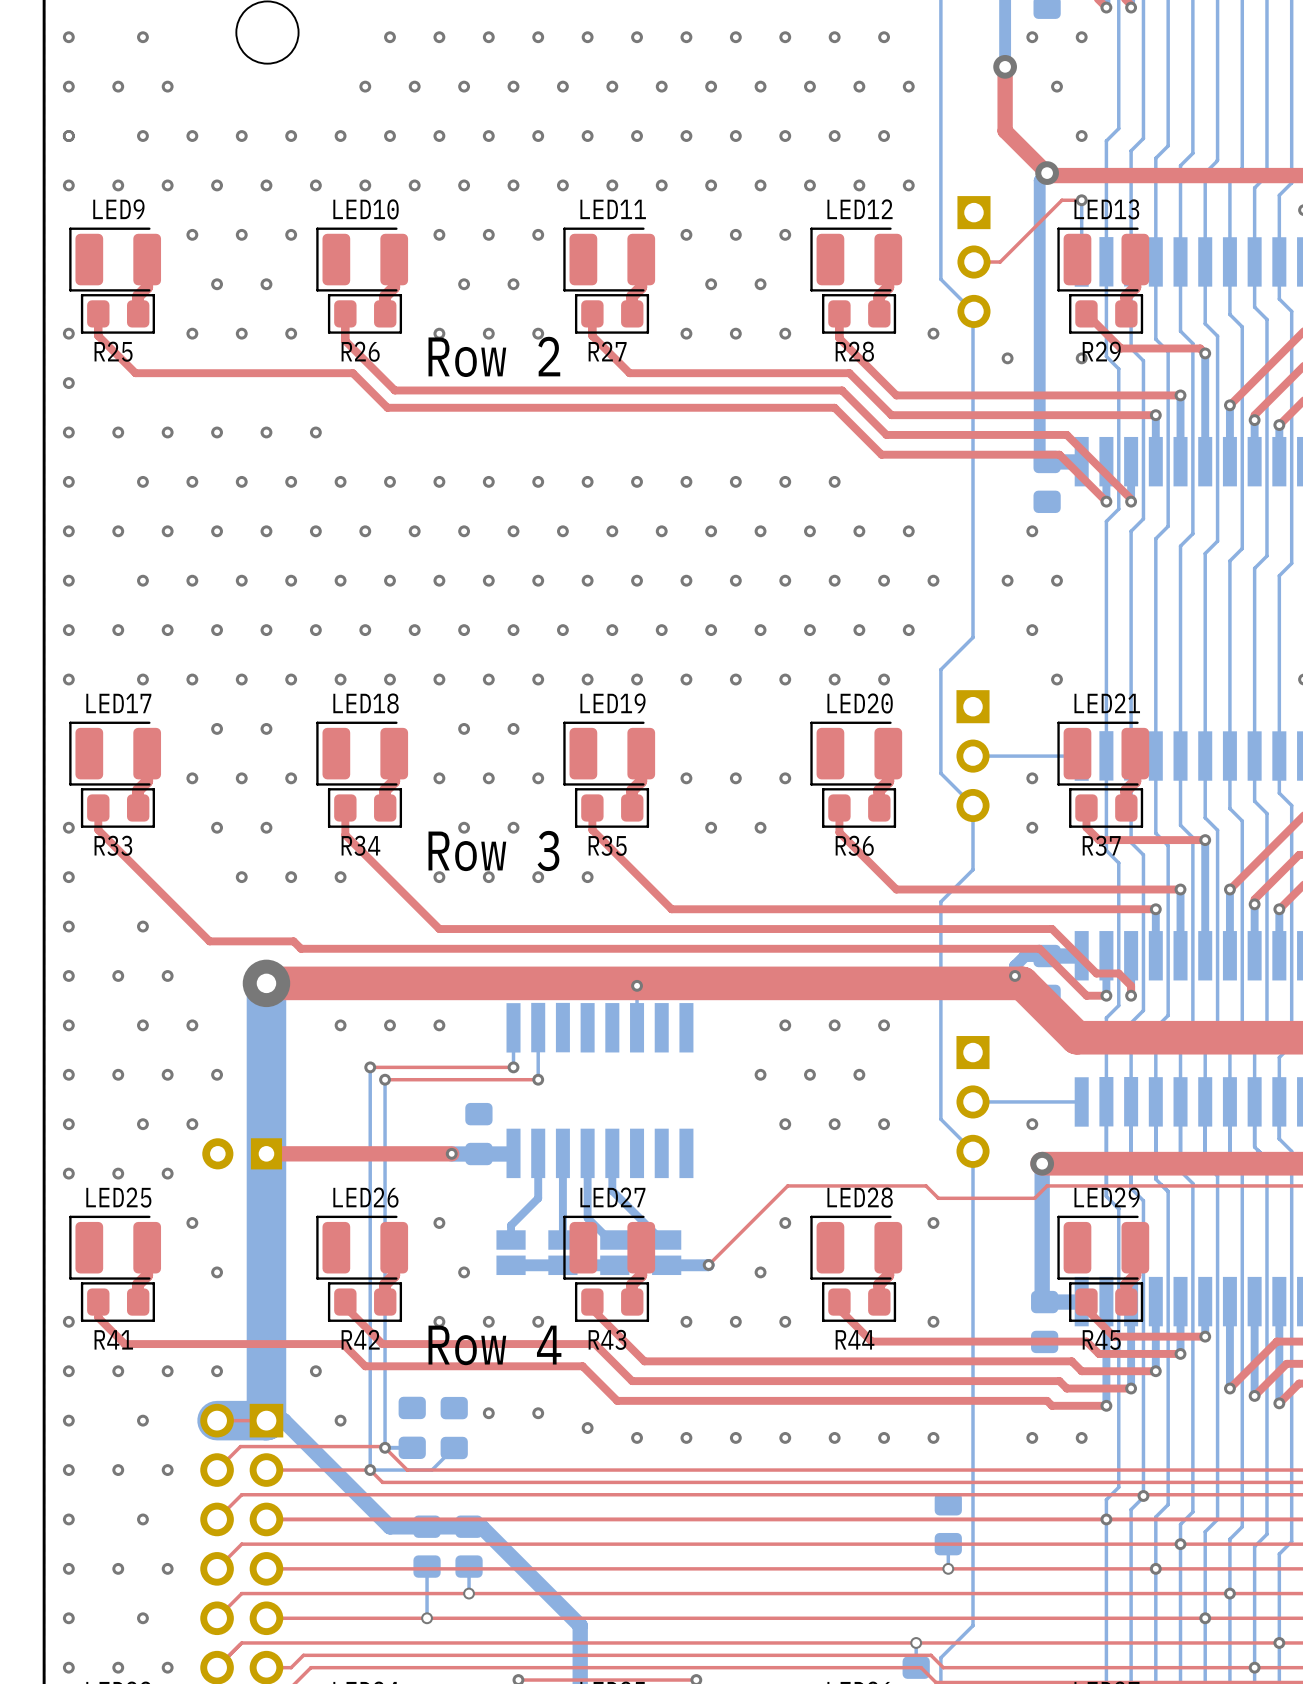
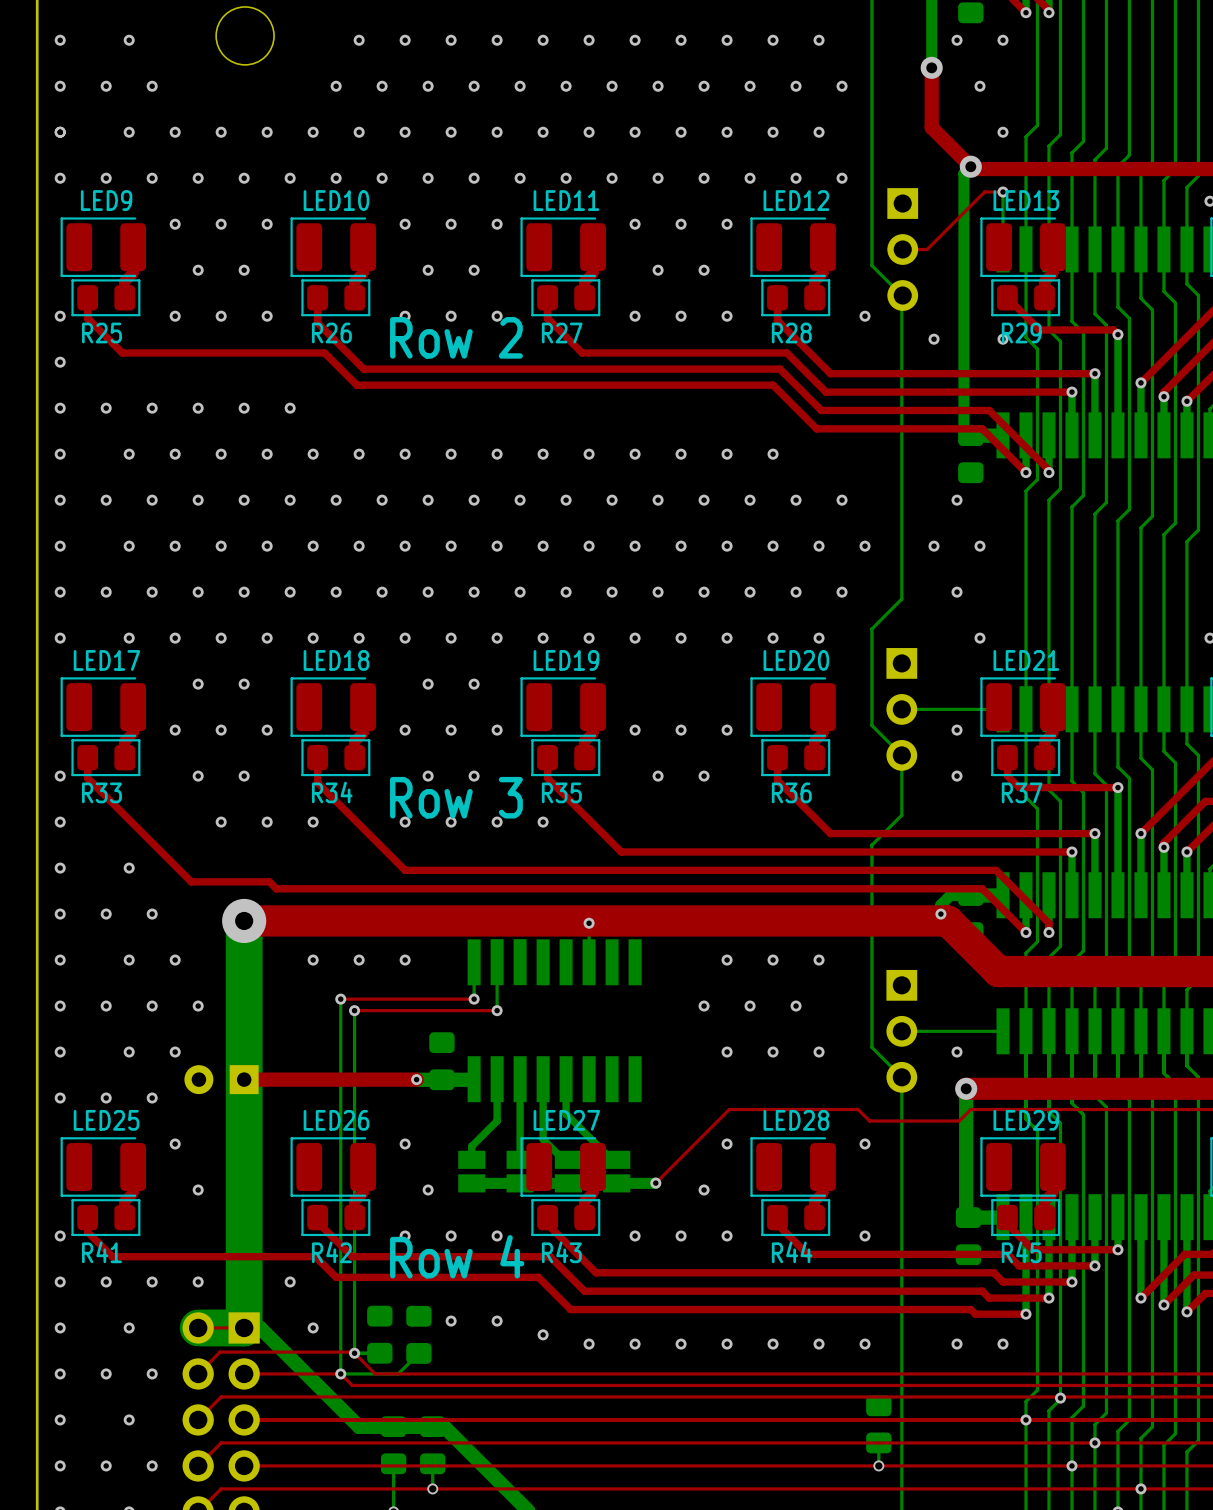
top track: (1052, 929) (1096, 973) (1118, 973) -> (975, 870) (996, 870) (1037, 911)
top track: (1039, 948) (1086, 995) (1106, 995) -> (963, 888) (982, 888) (1025, 932)

